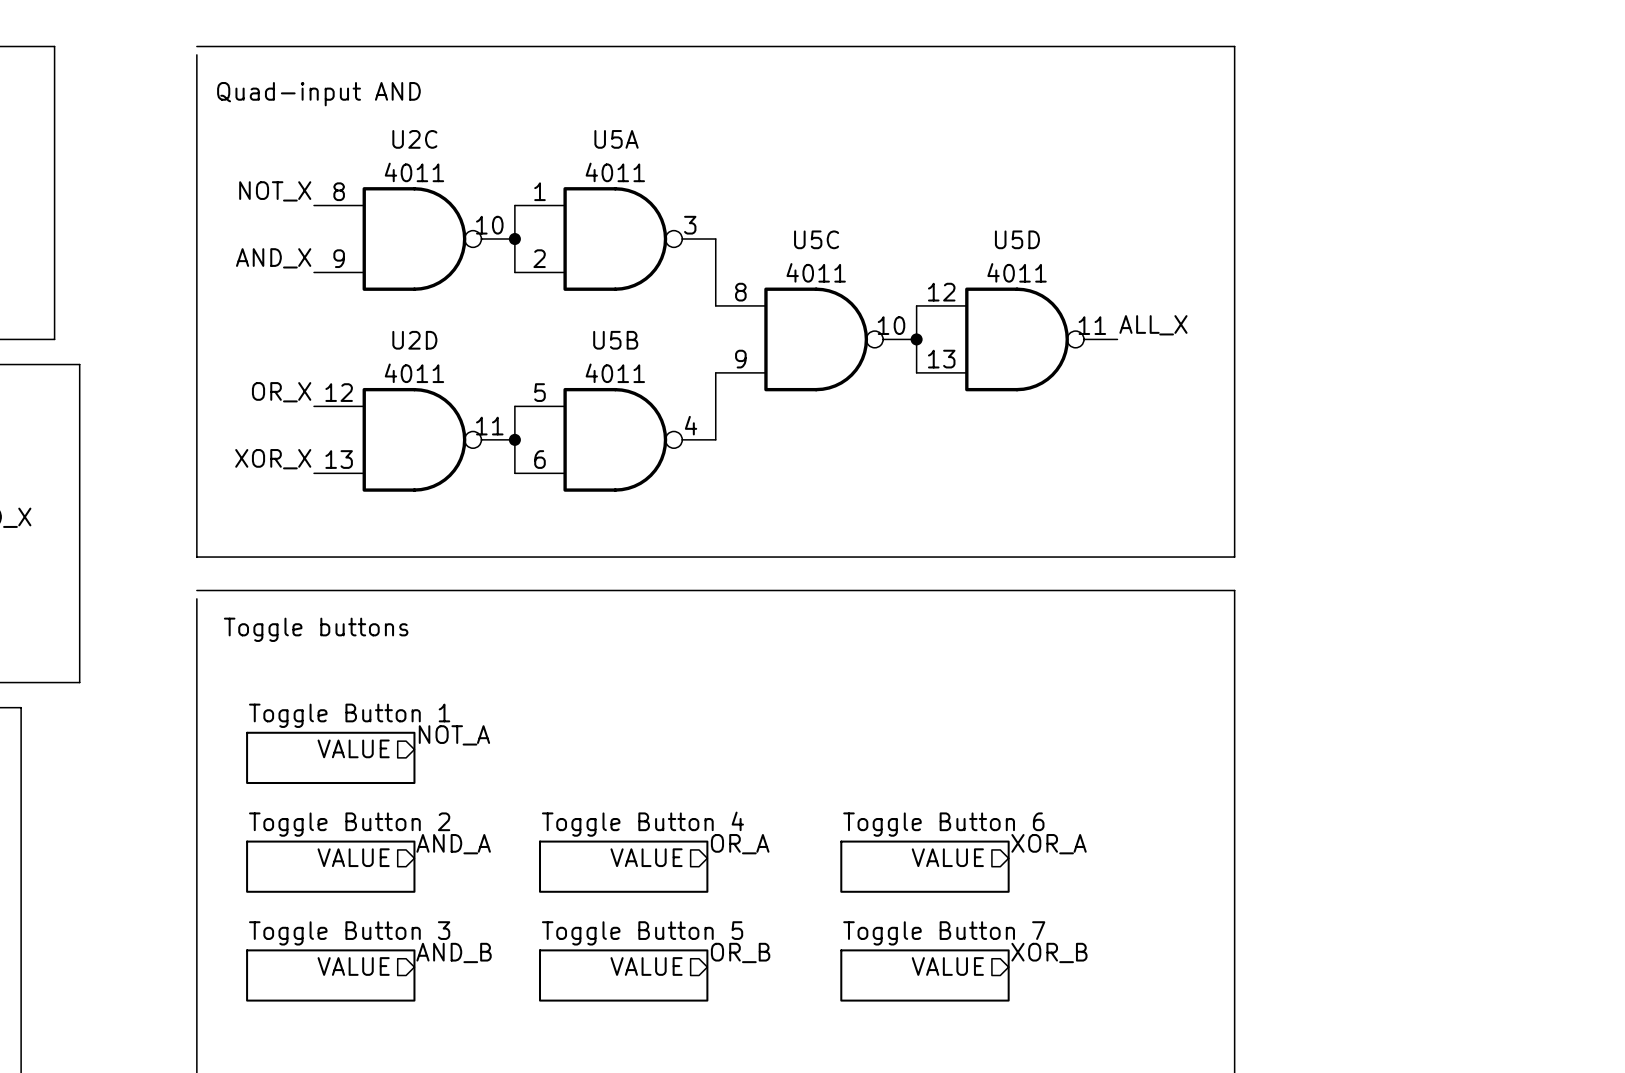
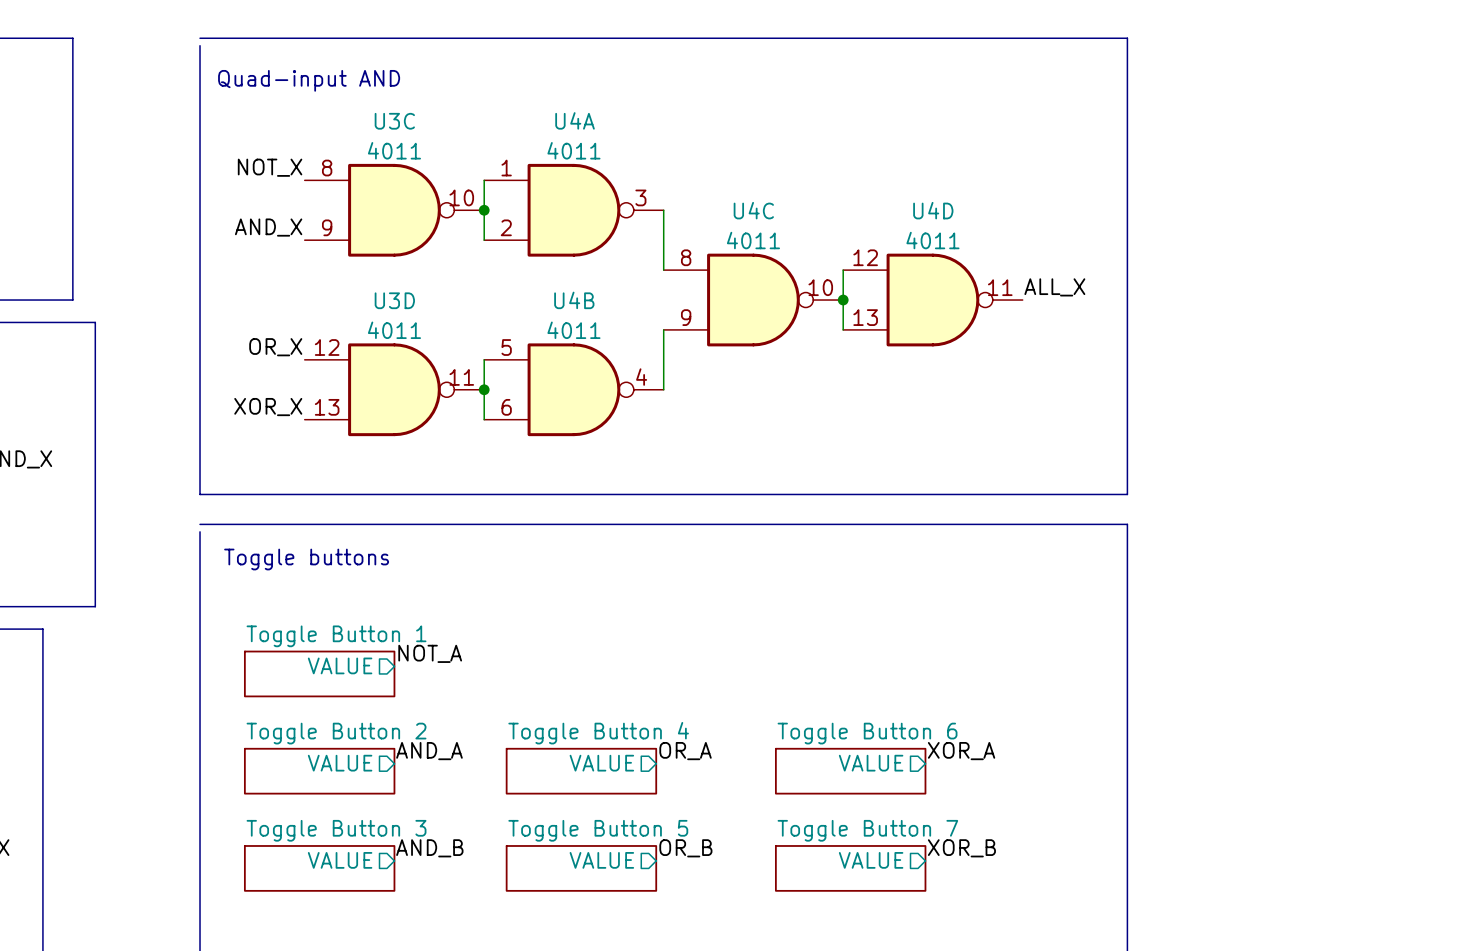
U2C name: U2C (414, 139) -> U3C (394, 121)
U5A name: U5A (616, 139) -> U4A (575, 120)
U5C name: U5C (816, 239) -> U4C (753, 210)
U5D name: U5D (1017, 239) -> U4D (933, 210)
U2D name: U2D (414, 340) -> U3D (394, 300)
U5B name: U5B (615, 340) -> U4B (574, 300)

